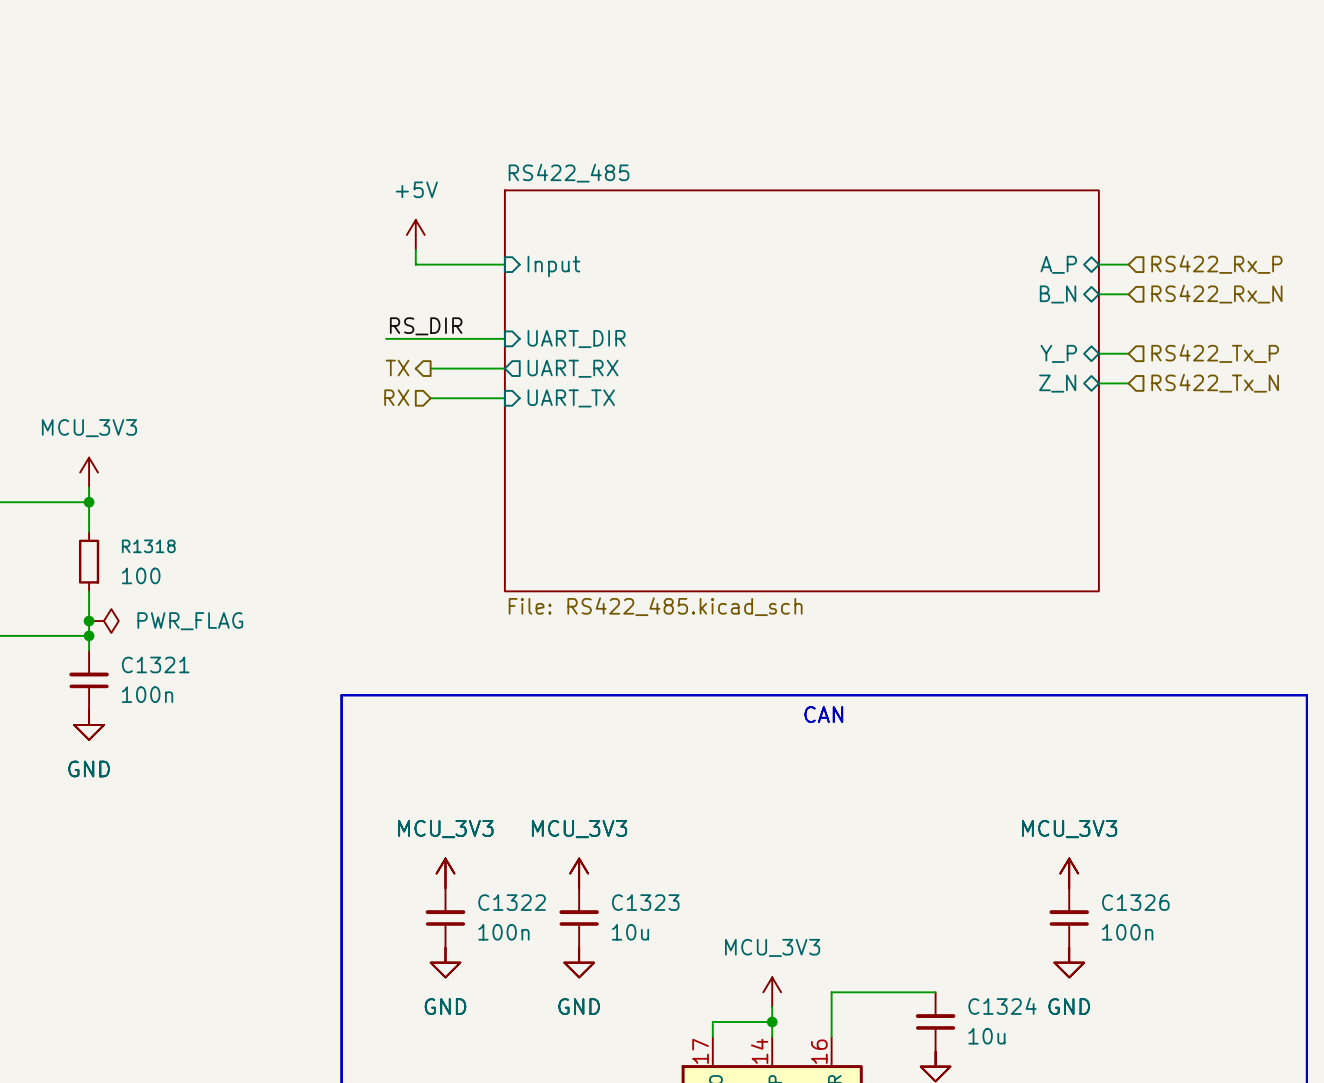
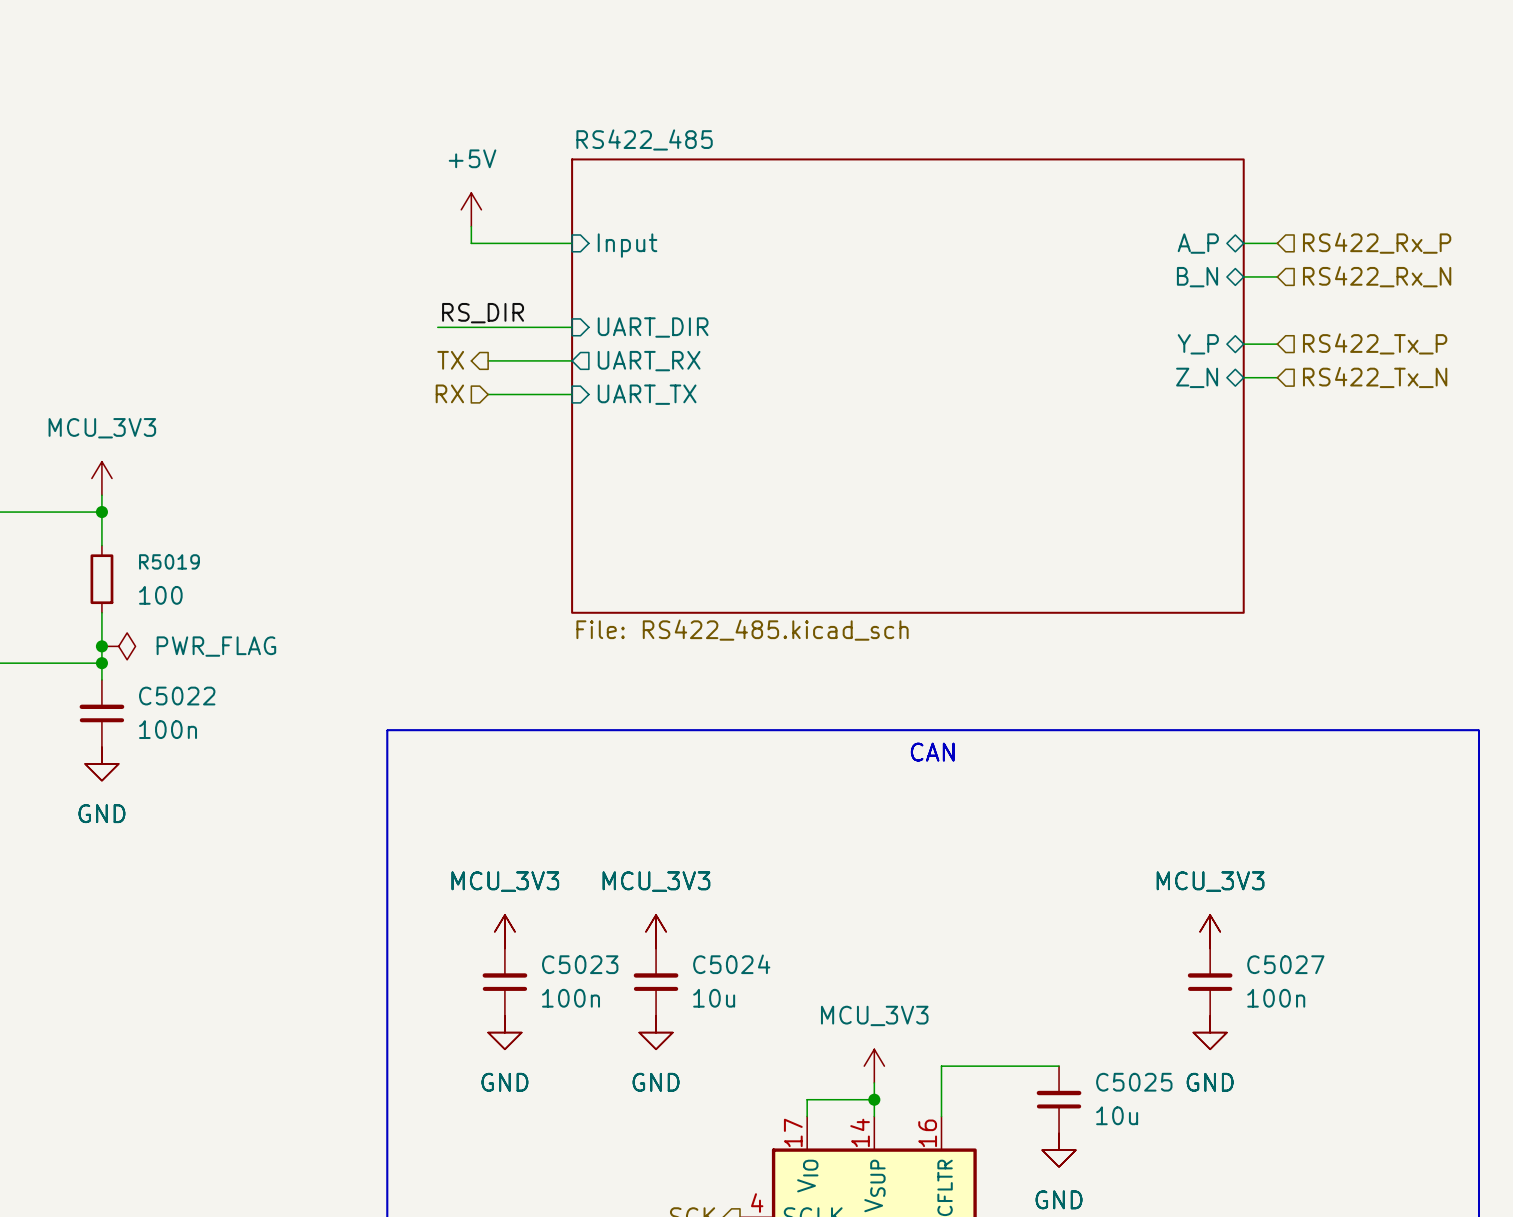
R1318 name: R1318 (148, 546) -> R5019 (169, 561)
C1321 name: C1321 (155, 664) -> C5022 (177, 696)
C1322 name: C1322 (512, 902) -> C5023 (580, 964)
C1323 name: C1323 (645, 902) -> C5024 (731, 964)
C1326 name: C1326 (1135, 902) -> C5027 (1285, 964)
C1324 name: C1324 (1002, 1006) -> C5025 (1134, 1082)

